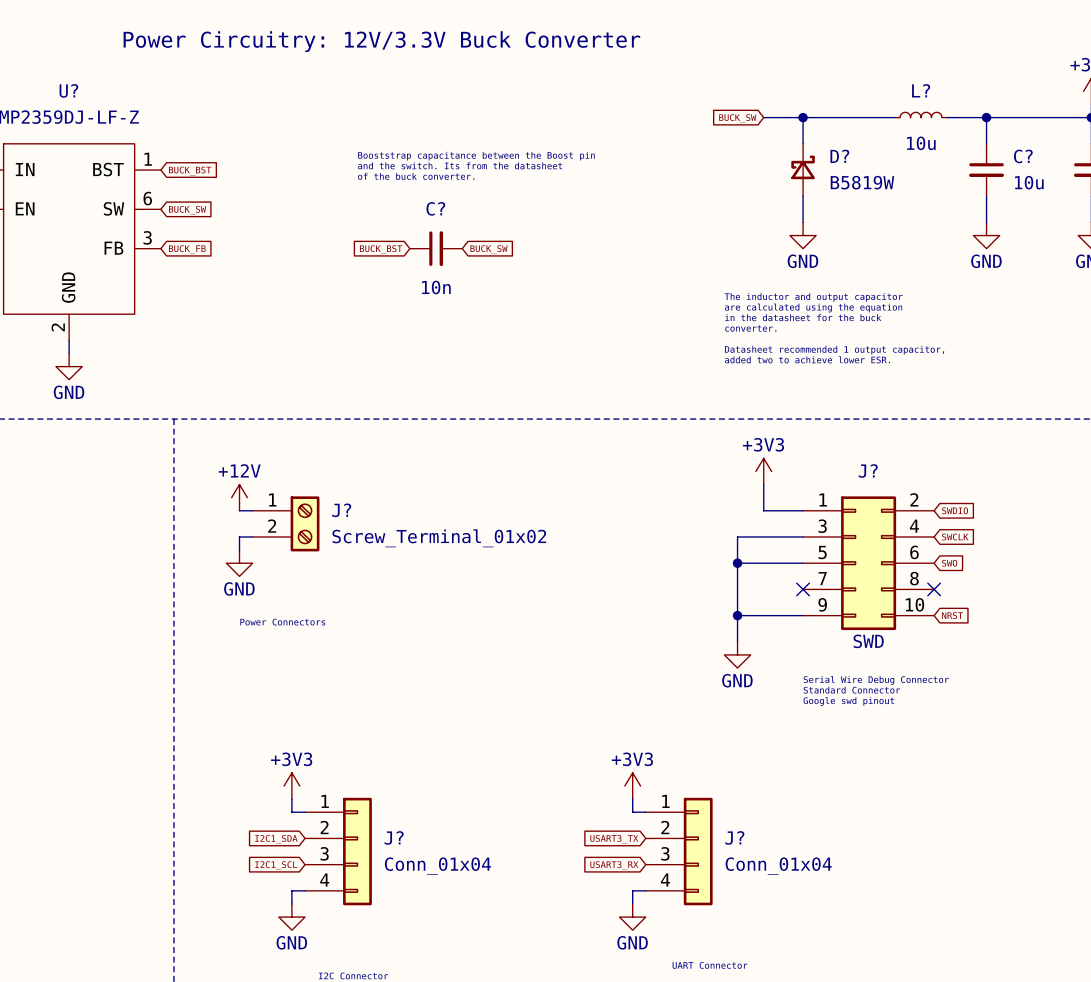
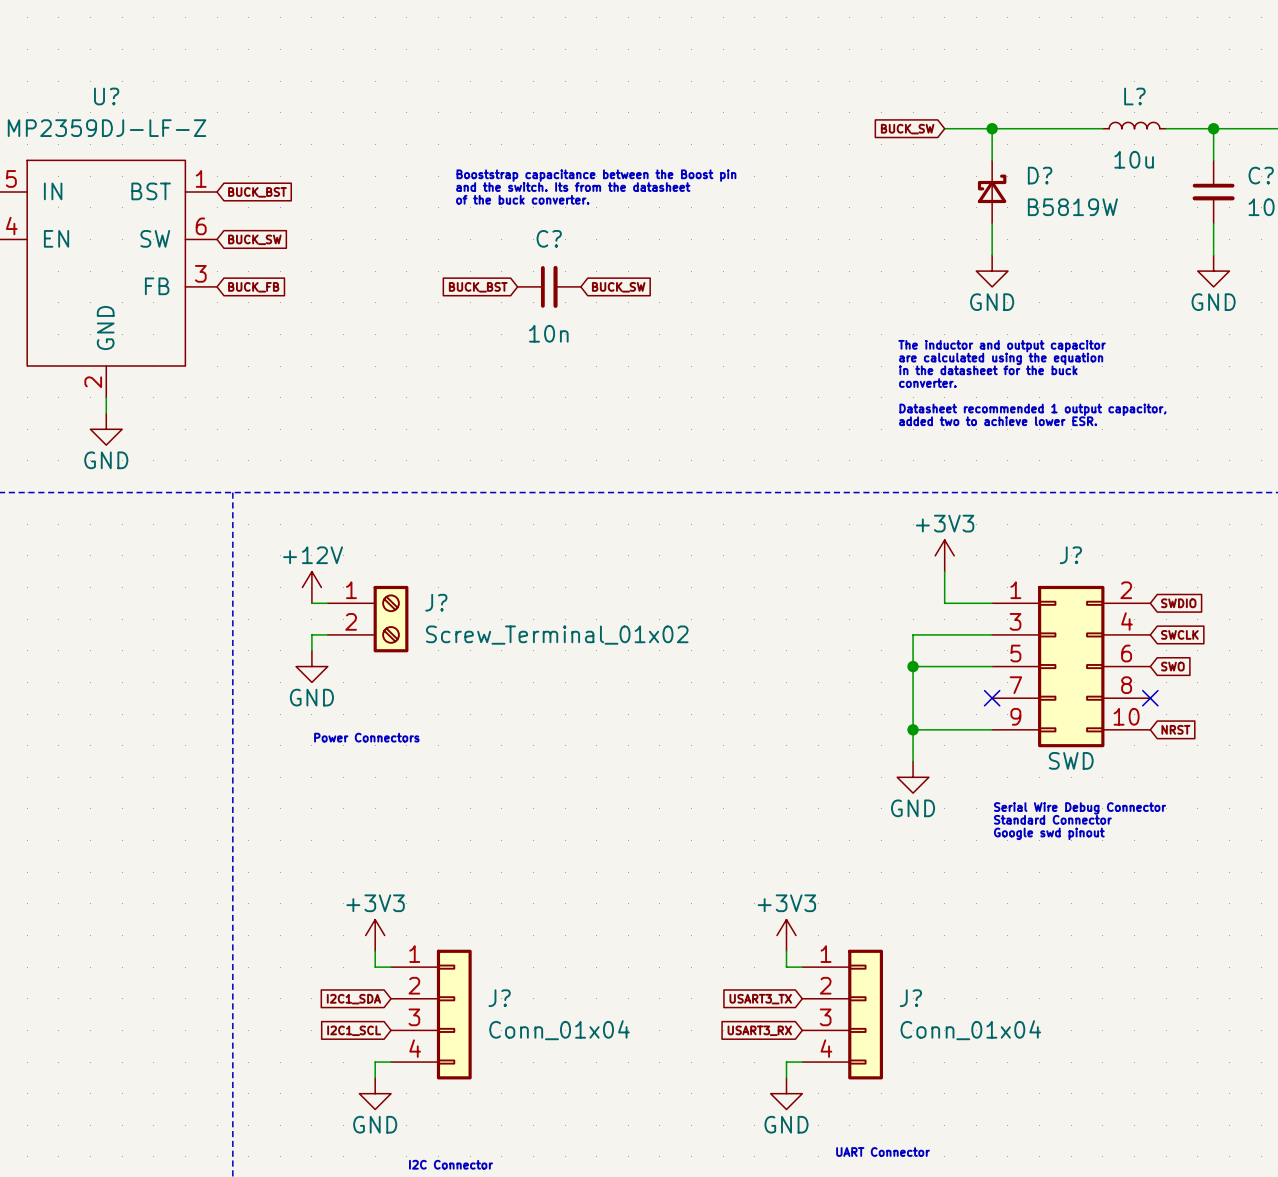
text: Power Circuitry: 12V/3.3V Buck Converter (381, 41) -> none

